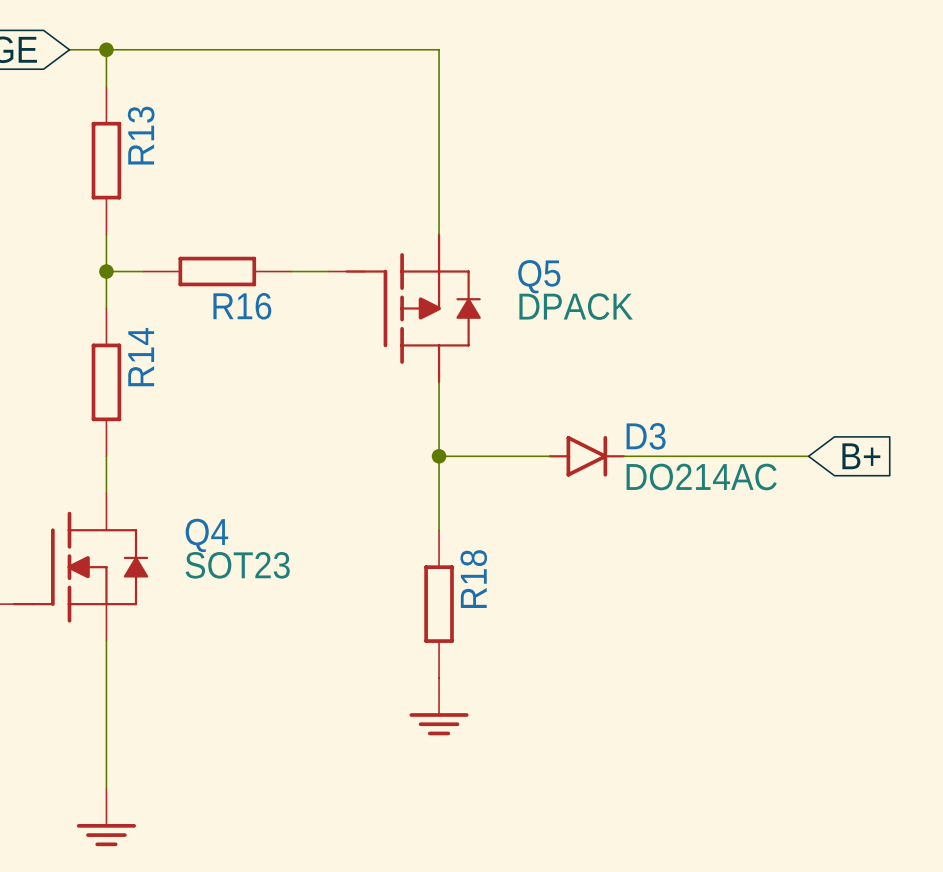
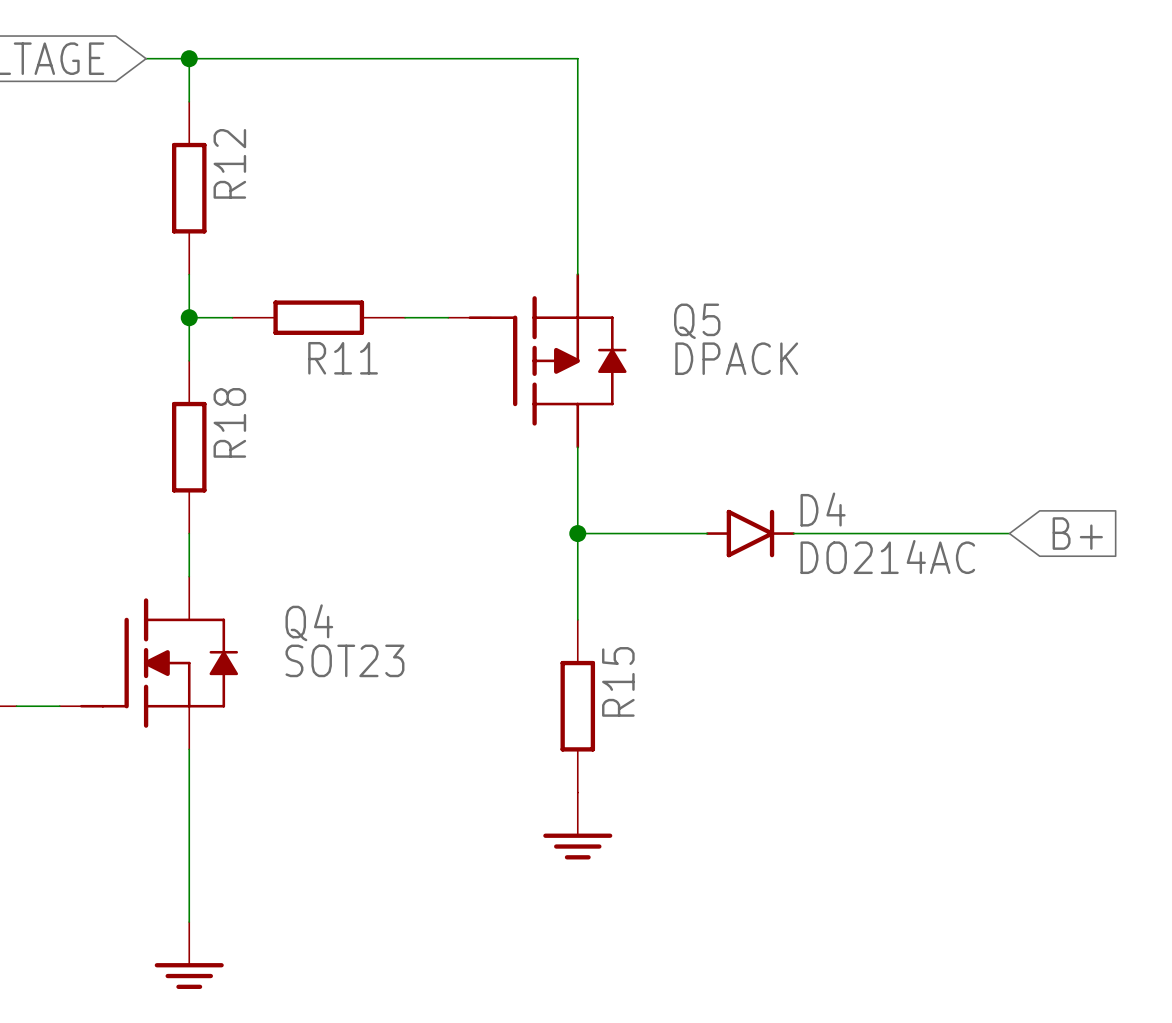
R13 name: R13 (141, 135) -> R12 (229, 163)
R16 name: R16 (242, 306) -> R11 (343, 358)
R14 name: R14 (141, 357) -> R18 (229, 422)
D3 name: D3 (646, 436) -> D4 (823, 509)
R18 name: R18 (473, 579) -> R15 (618, 681)

